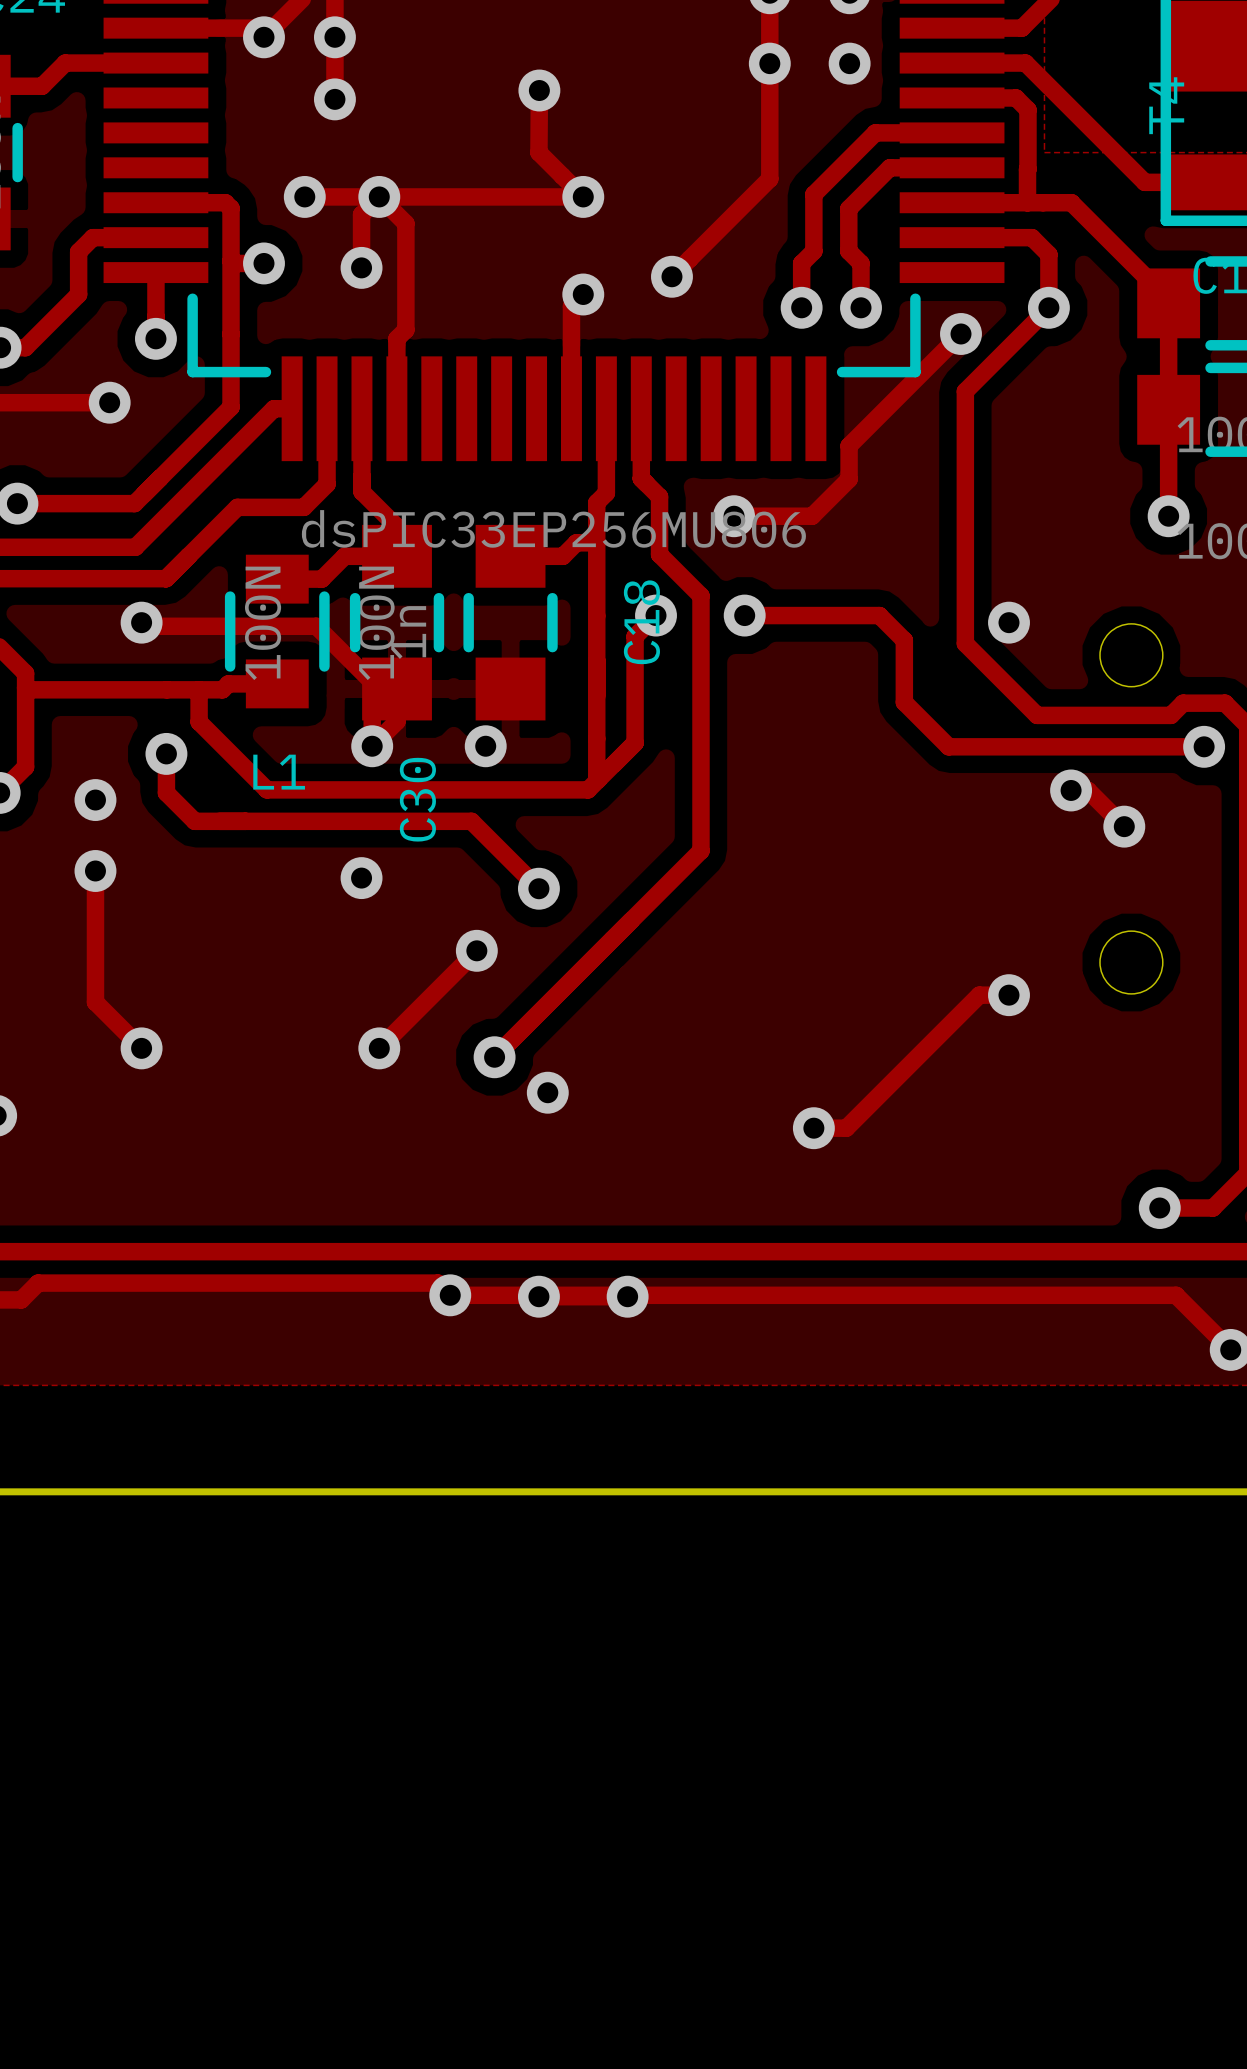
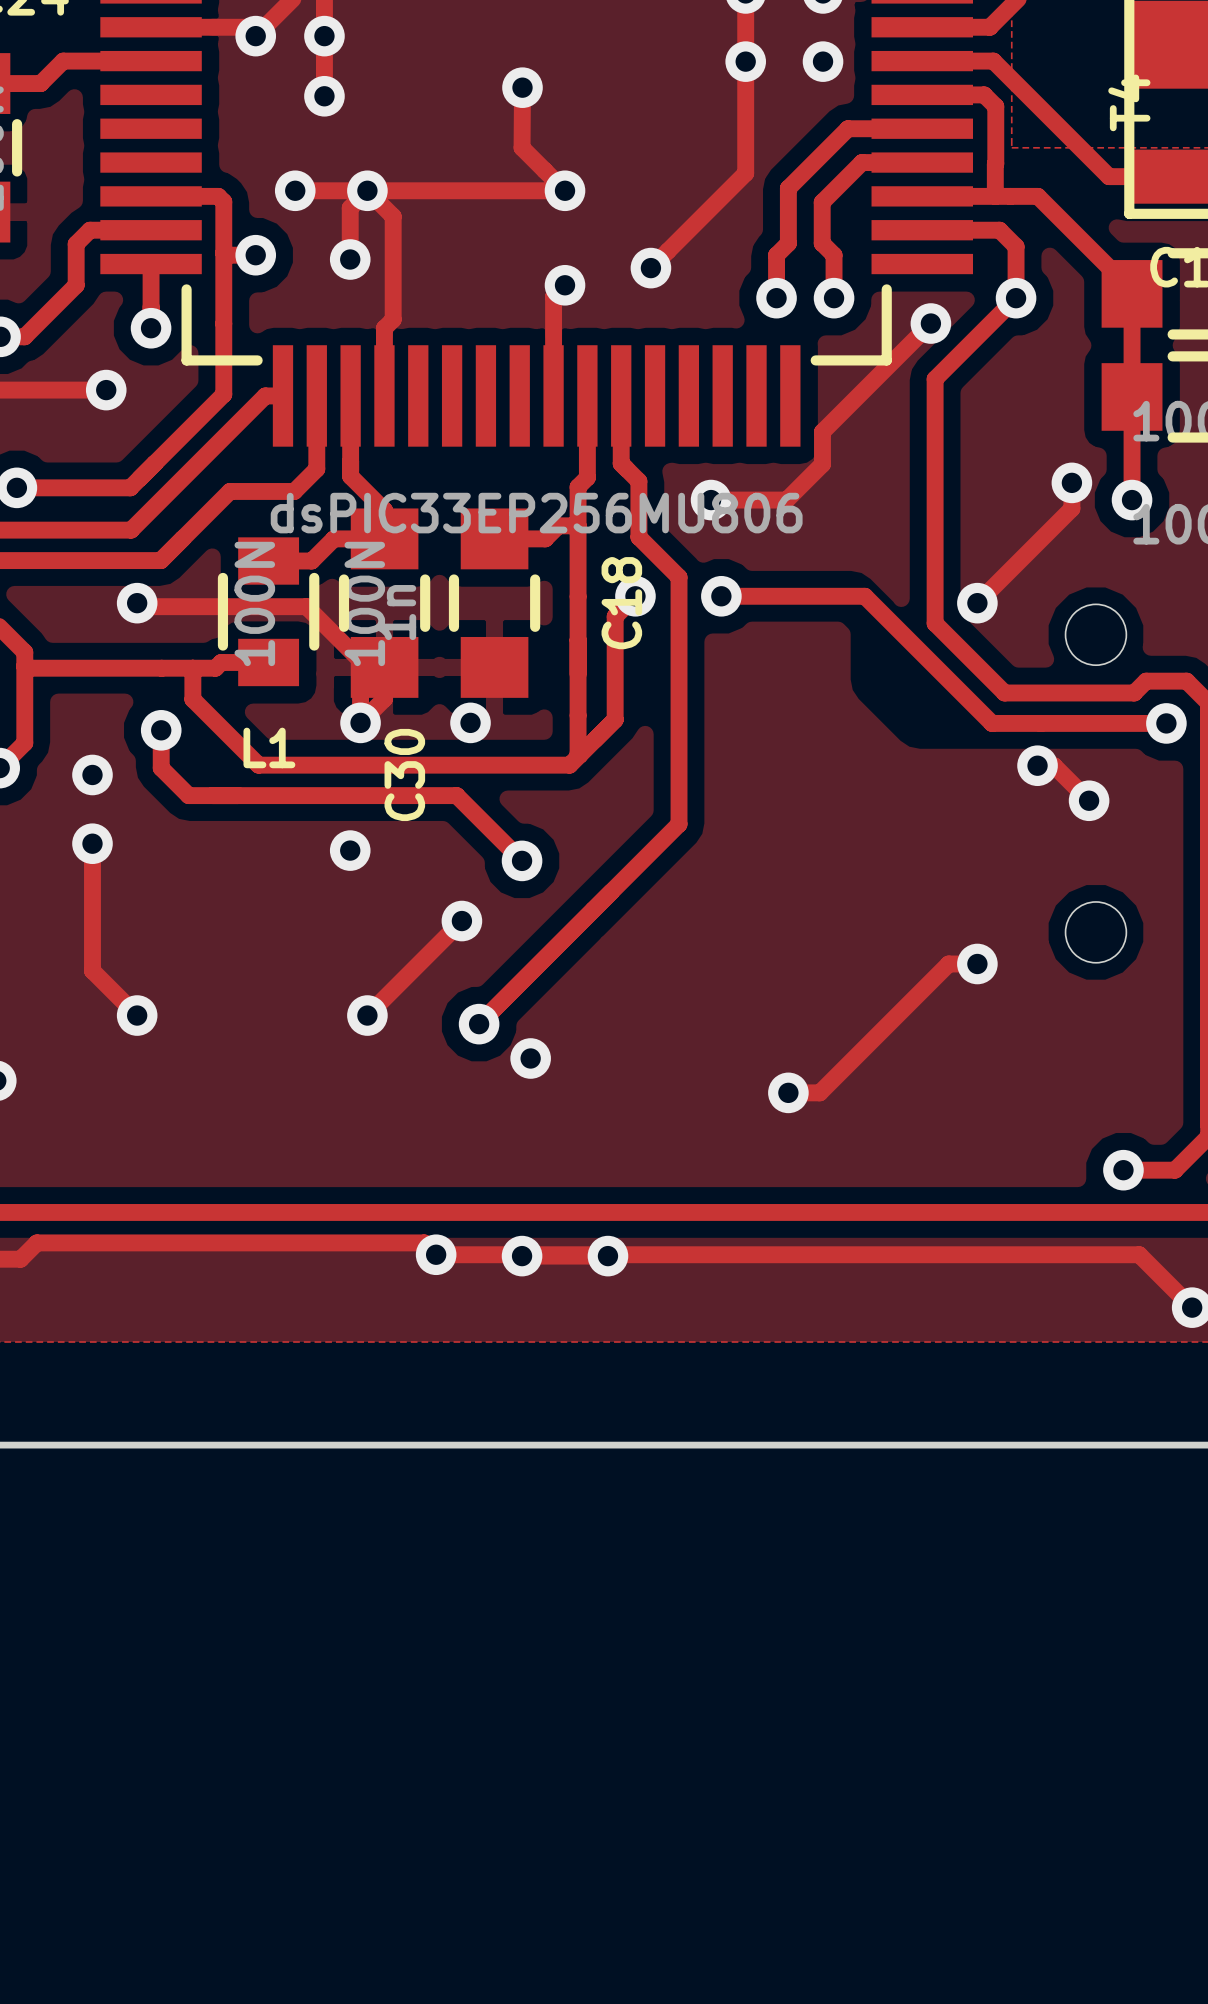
track: none -> (1071, 482) (1071, 508) (977, 603)
via: none -> (1071, 482)
track: (879, 615) (904, 640) (904, 702) (948, 746) (1024, 746) -> (851, 596) (864, 596) (992, 723)

